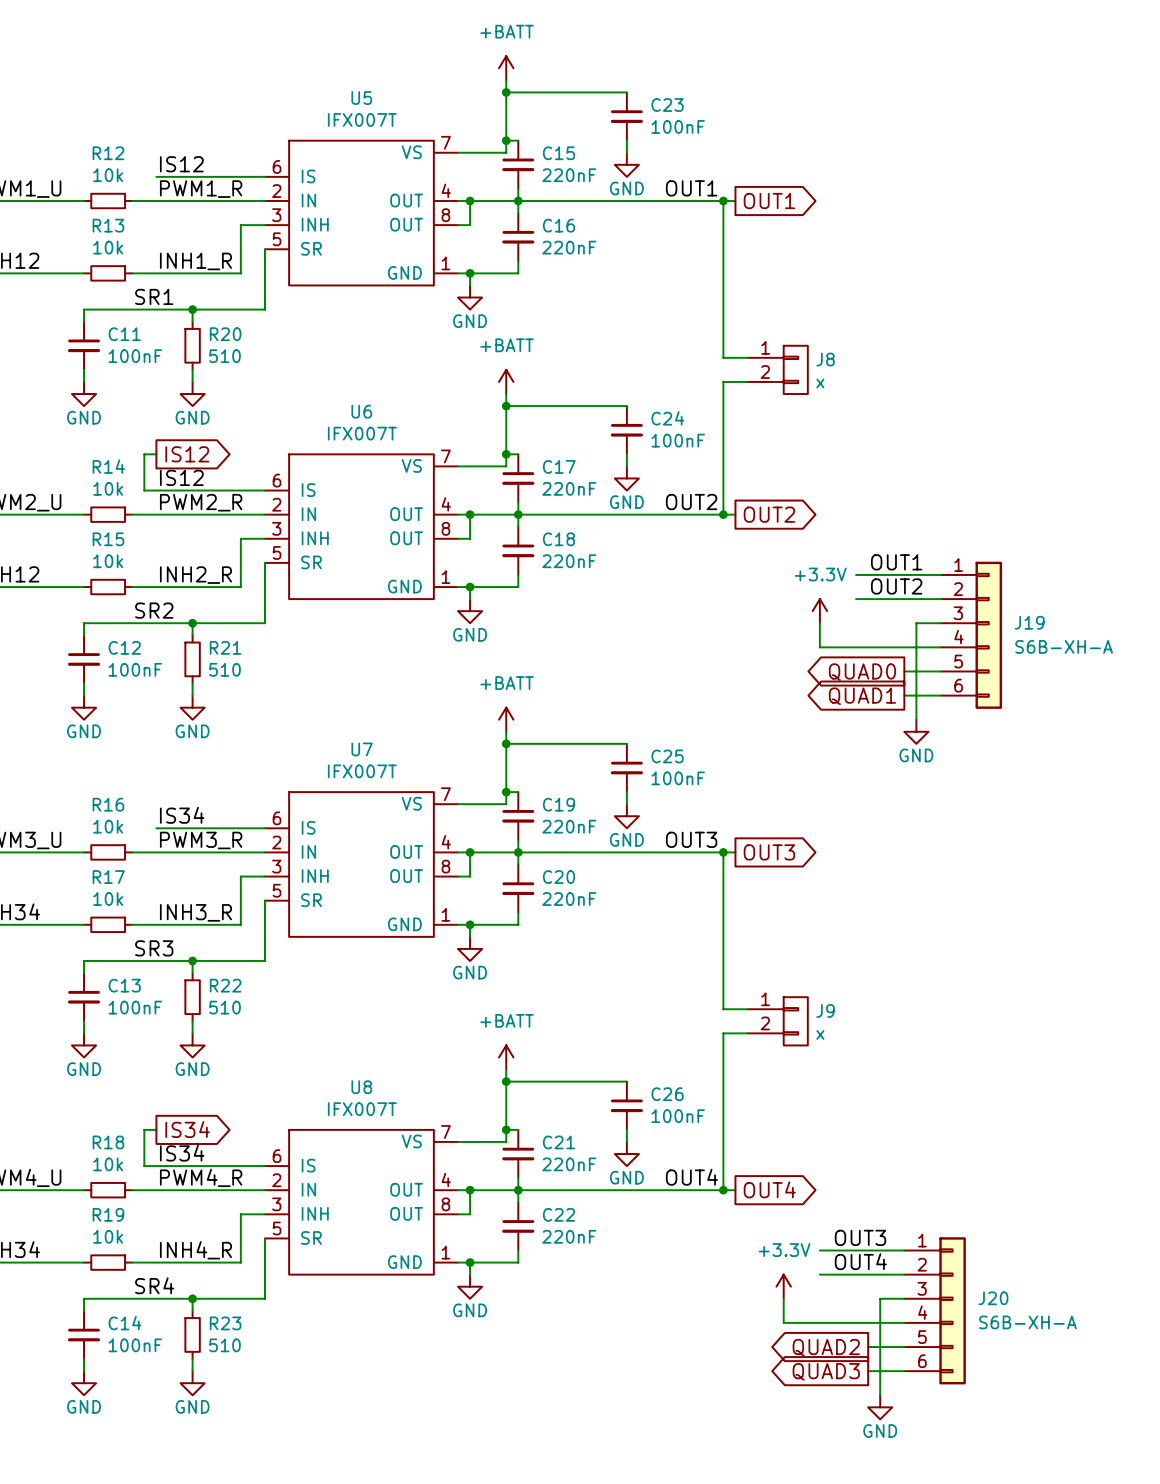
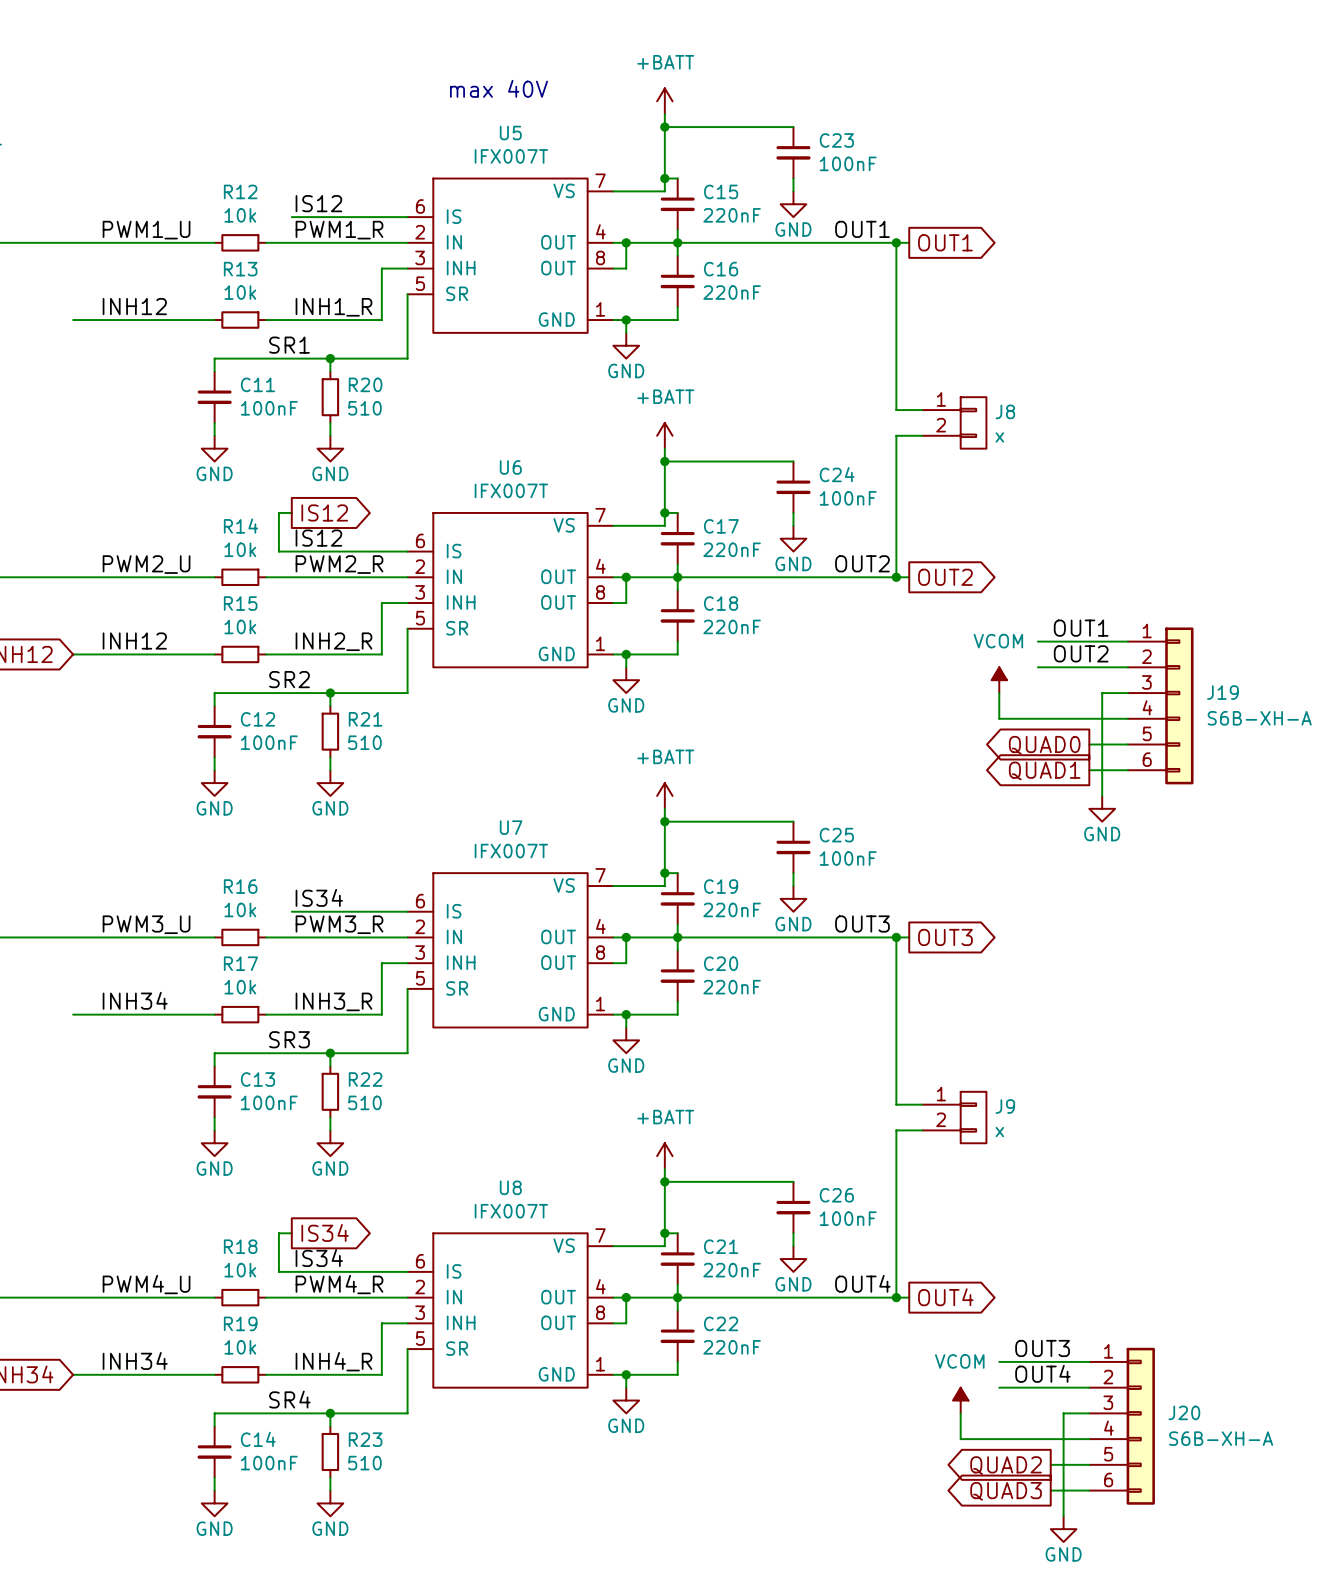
text: none -> max 40V (499, 88)
power symbol: +3.3V (819, 611) -> VCOM (999, 680)
power symbol: +3.3V (783, 1286) -> VCOM (960, 1400)

